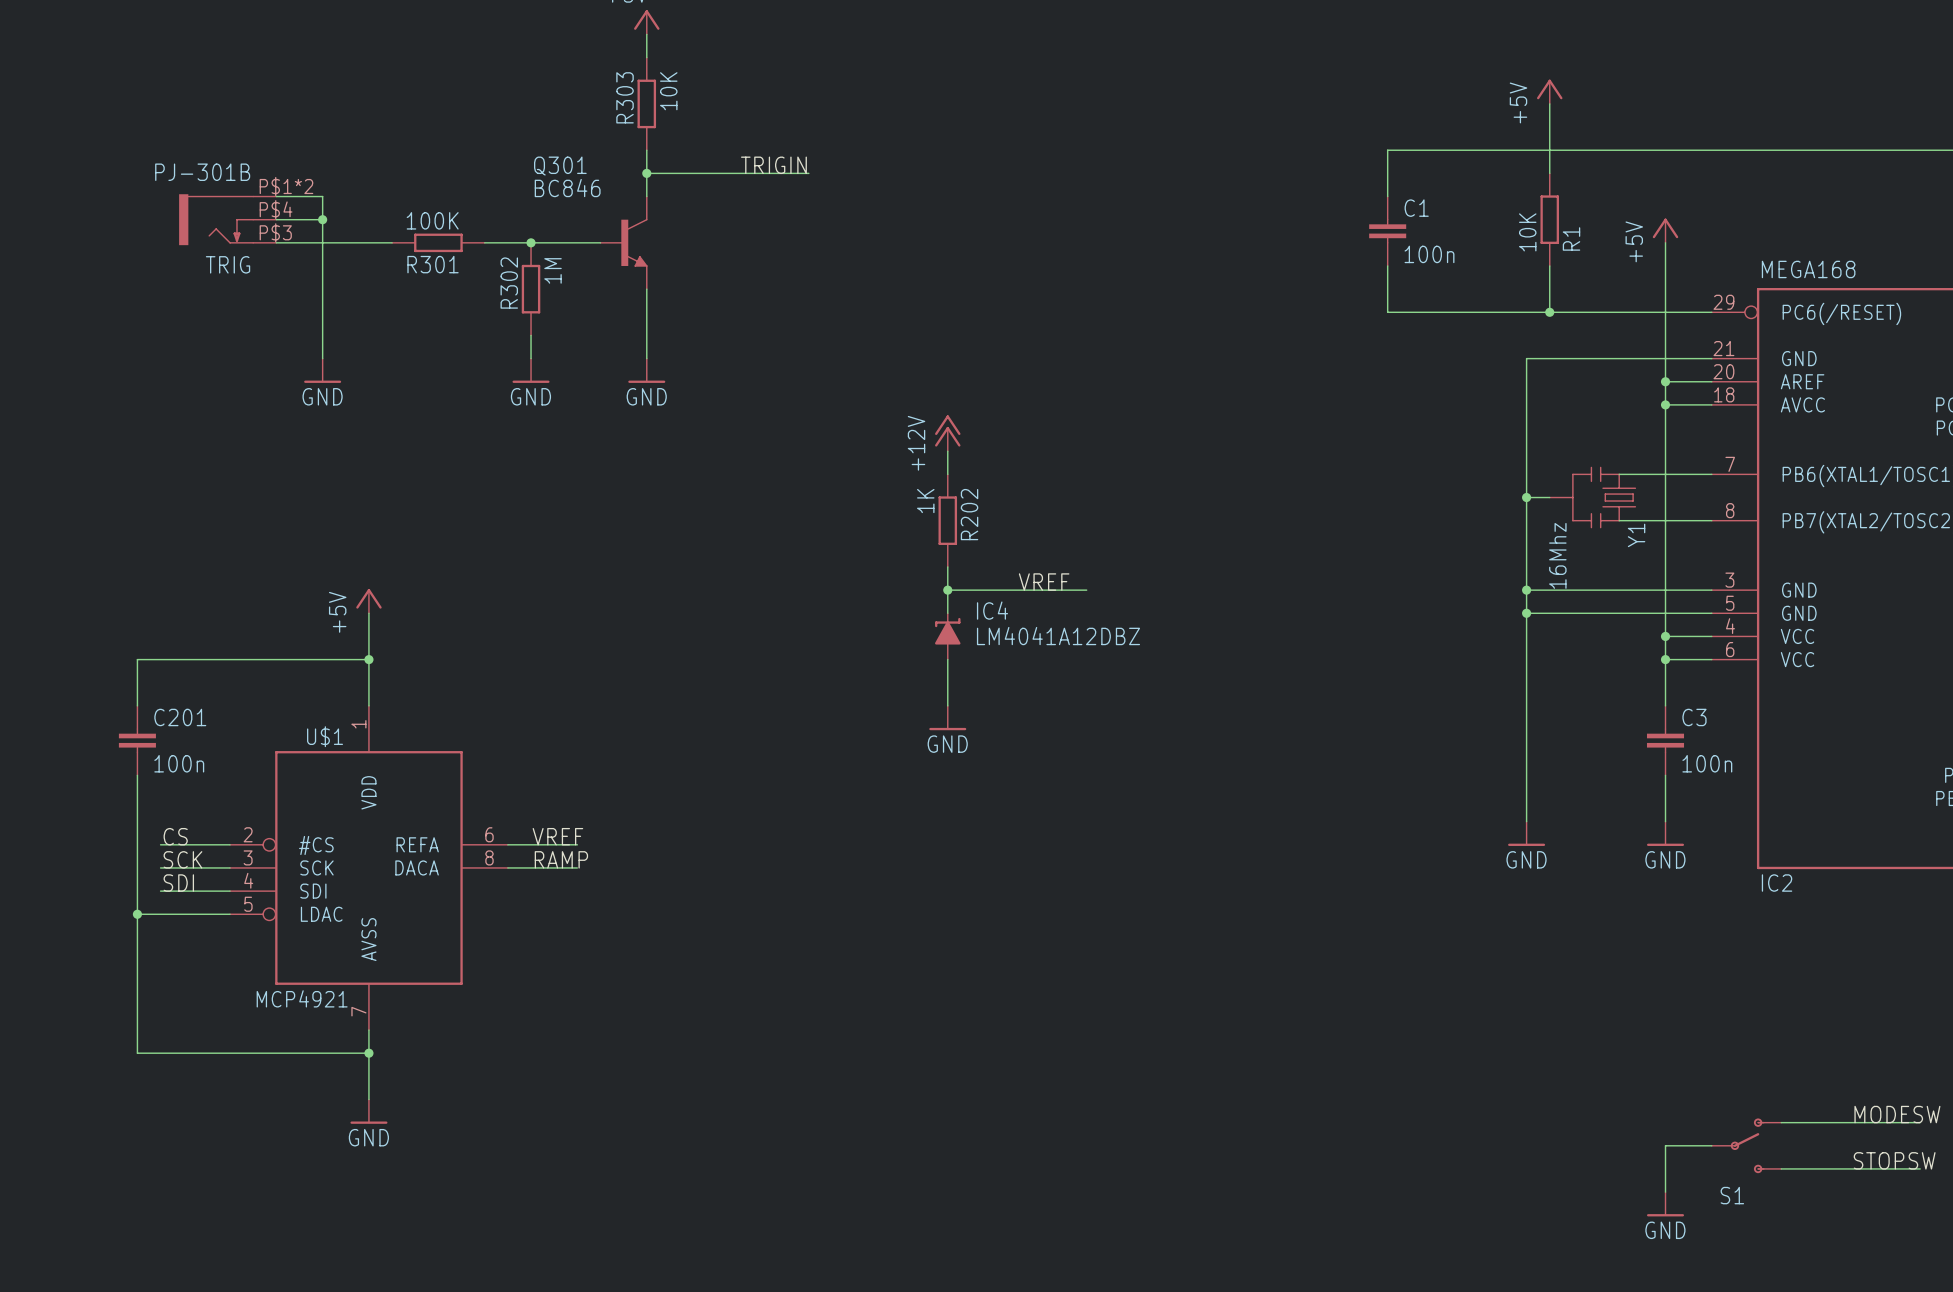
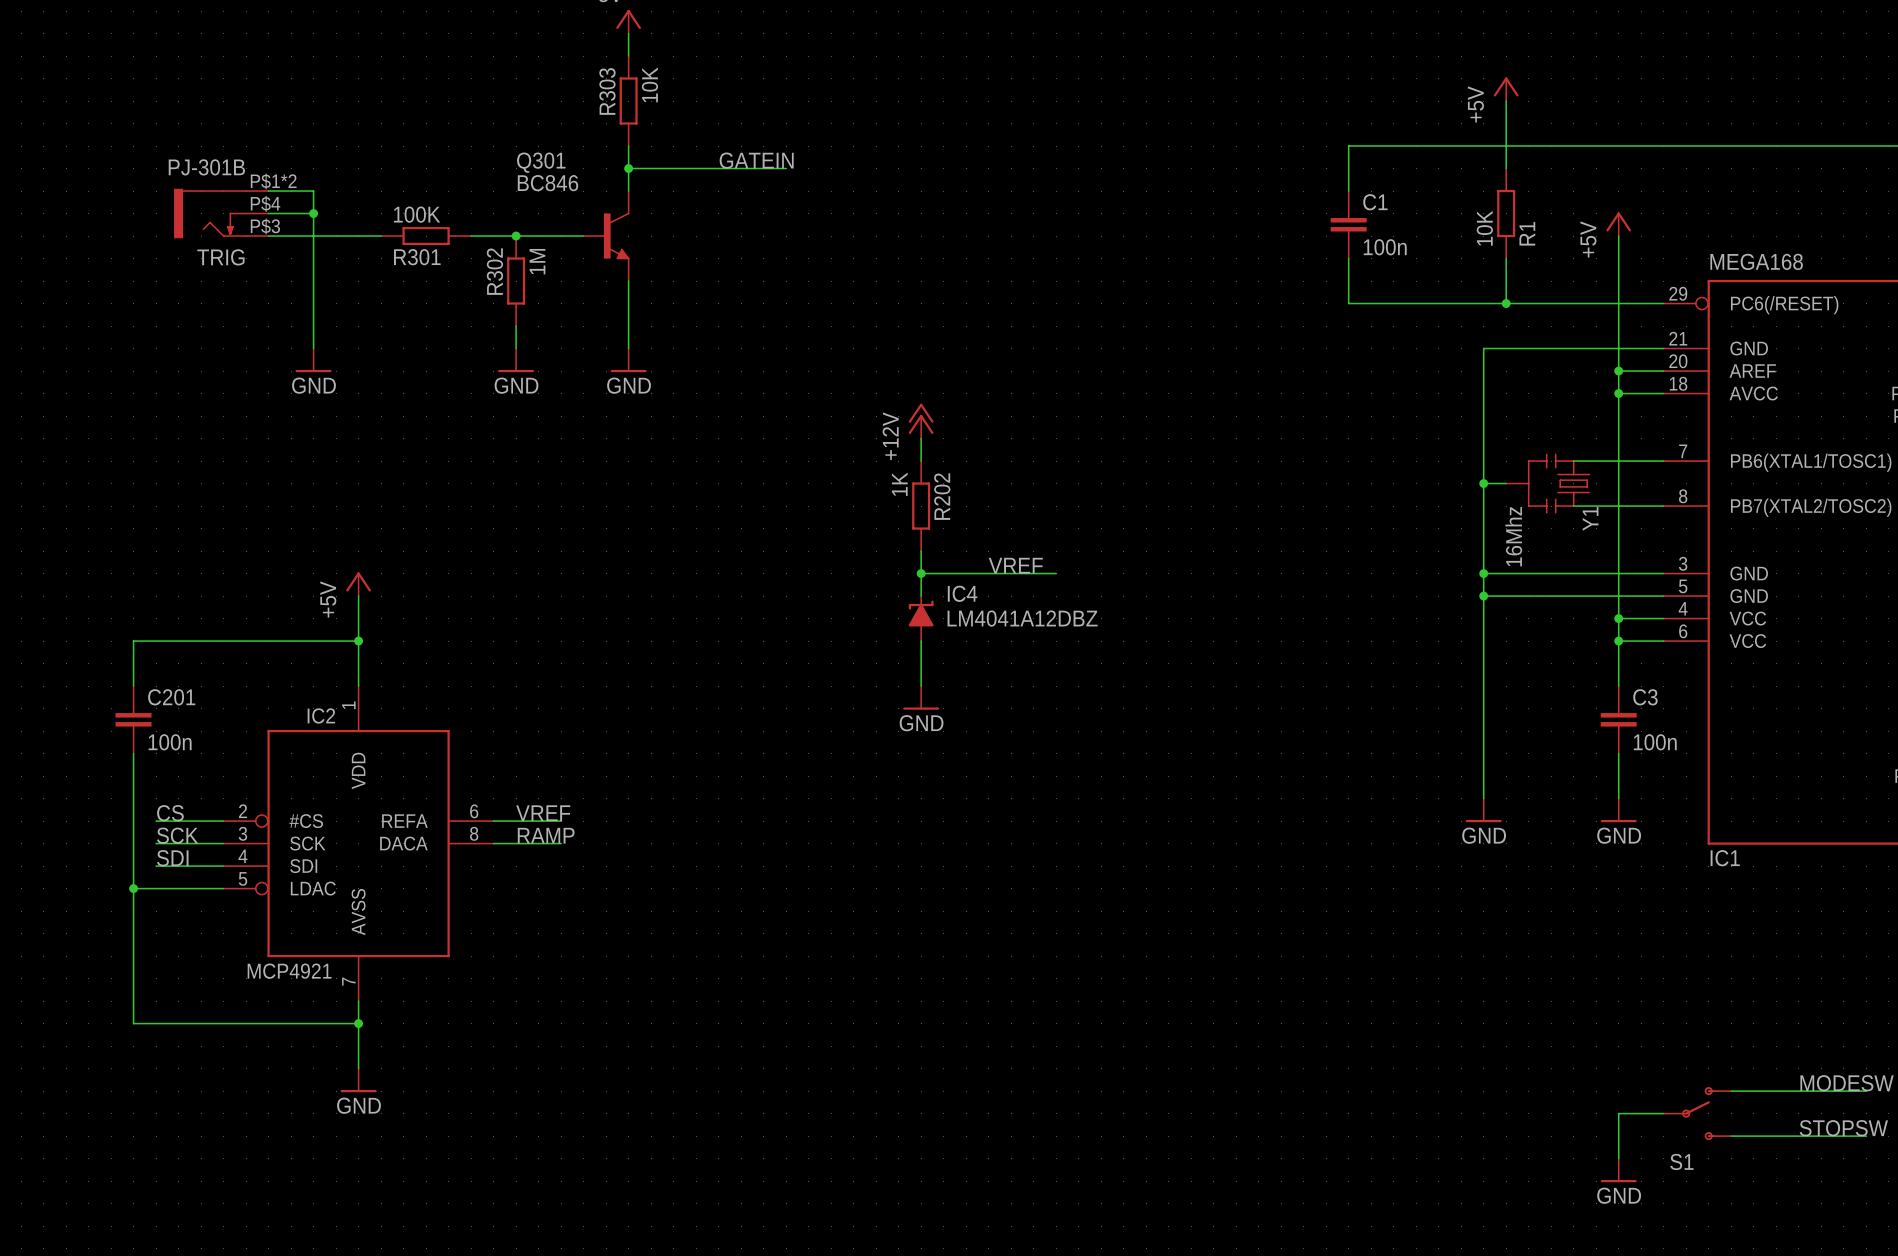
label: TRIGIN (773, 165) -> GATEIN (756, 160)
U$1 name: U$1 (325, 736) -> IC2 (321, 715)
IC2 name: IC2 (1777, 883) -> IC1 (1725, 858)

